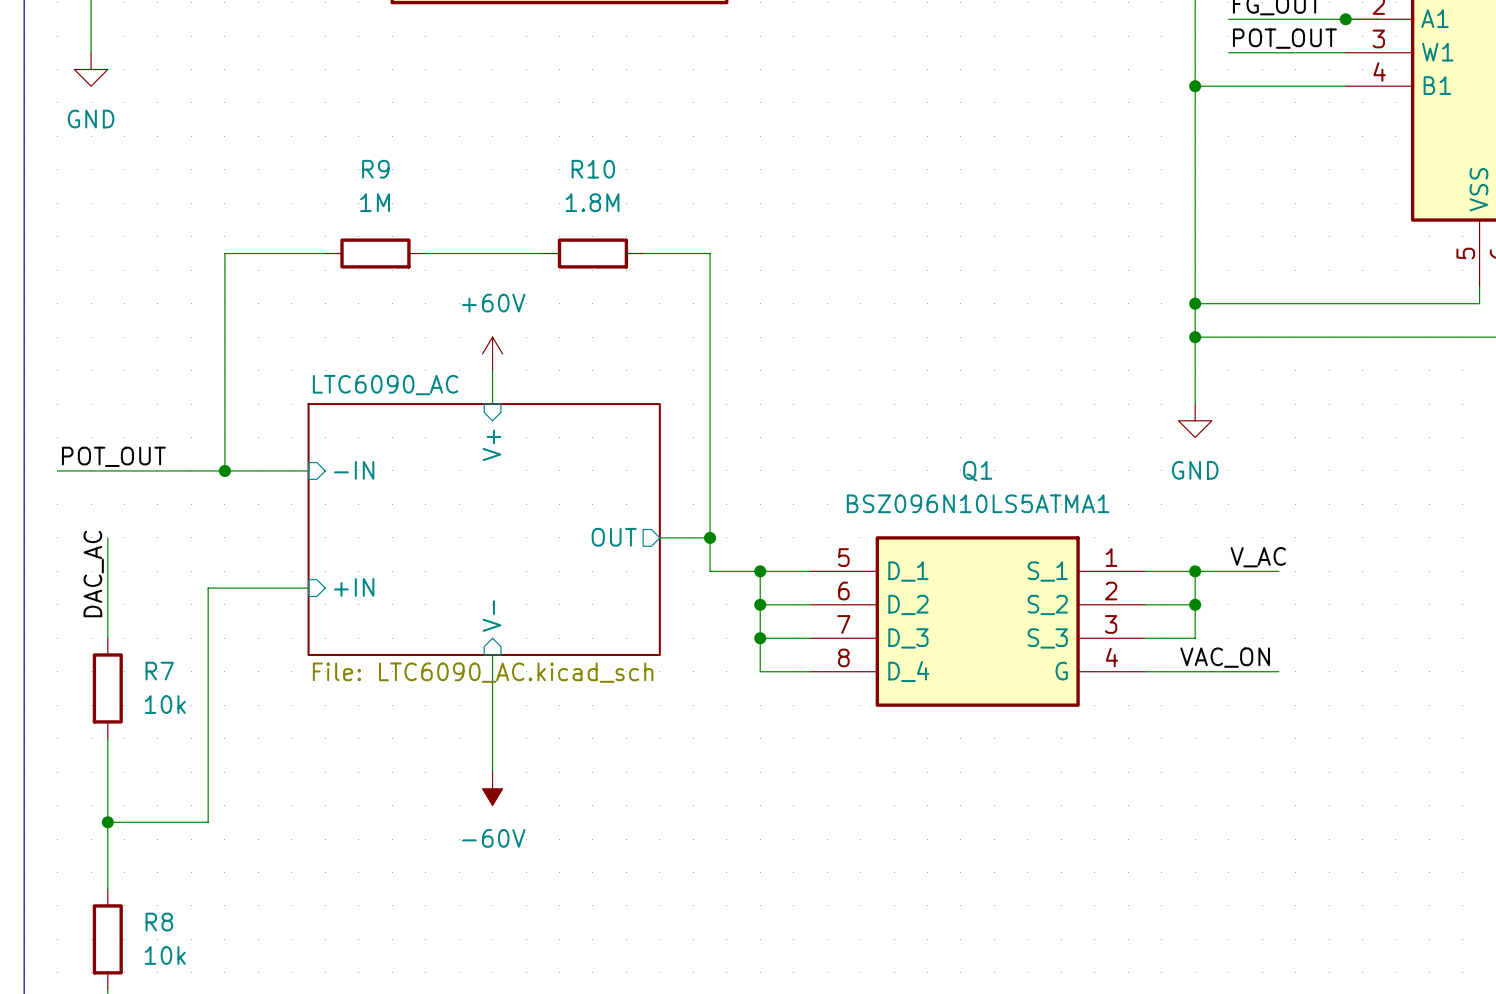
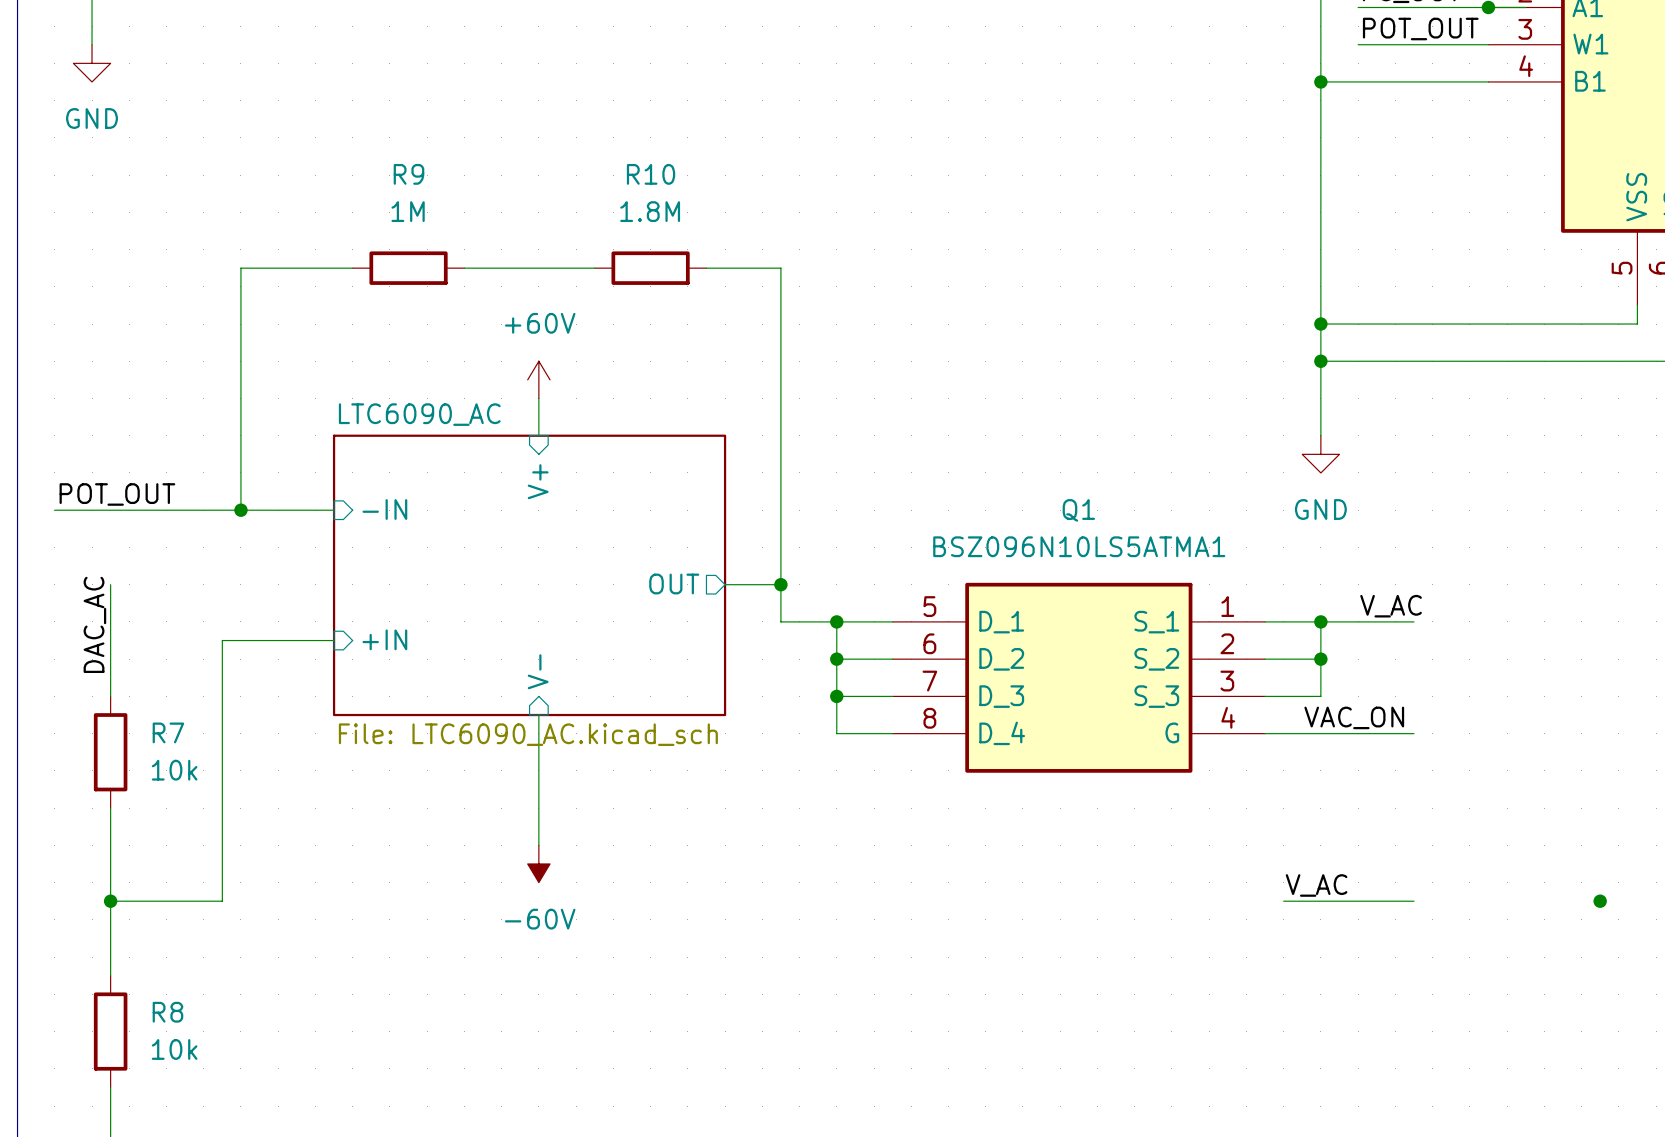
label: none -> V_AC (1316, 885)
wire: none -> (1283, 901) (1413, 901)
junction: none -> (1600, 901)

